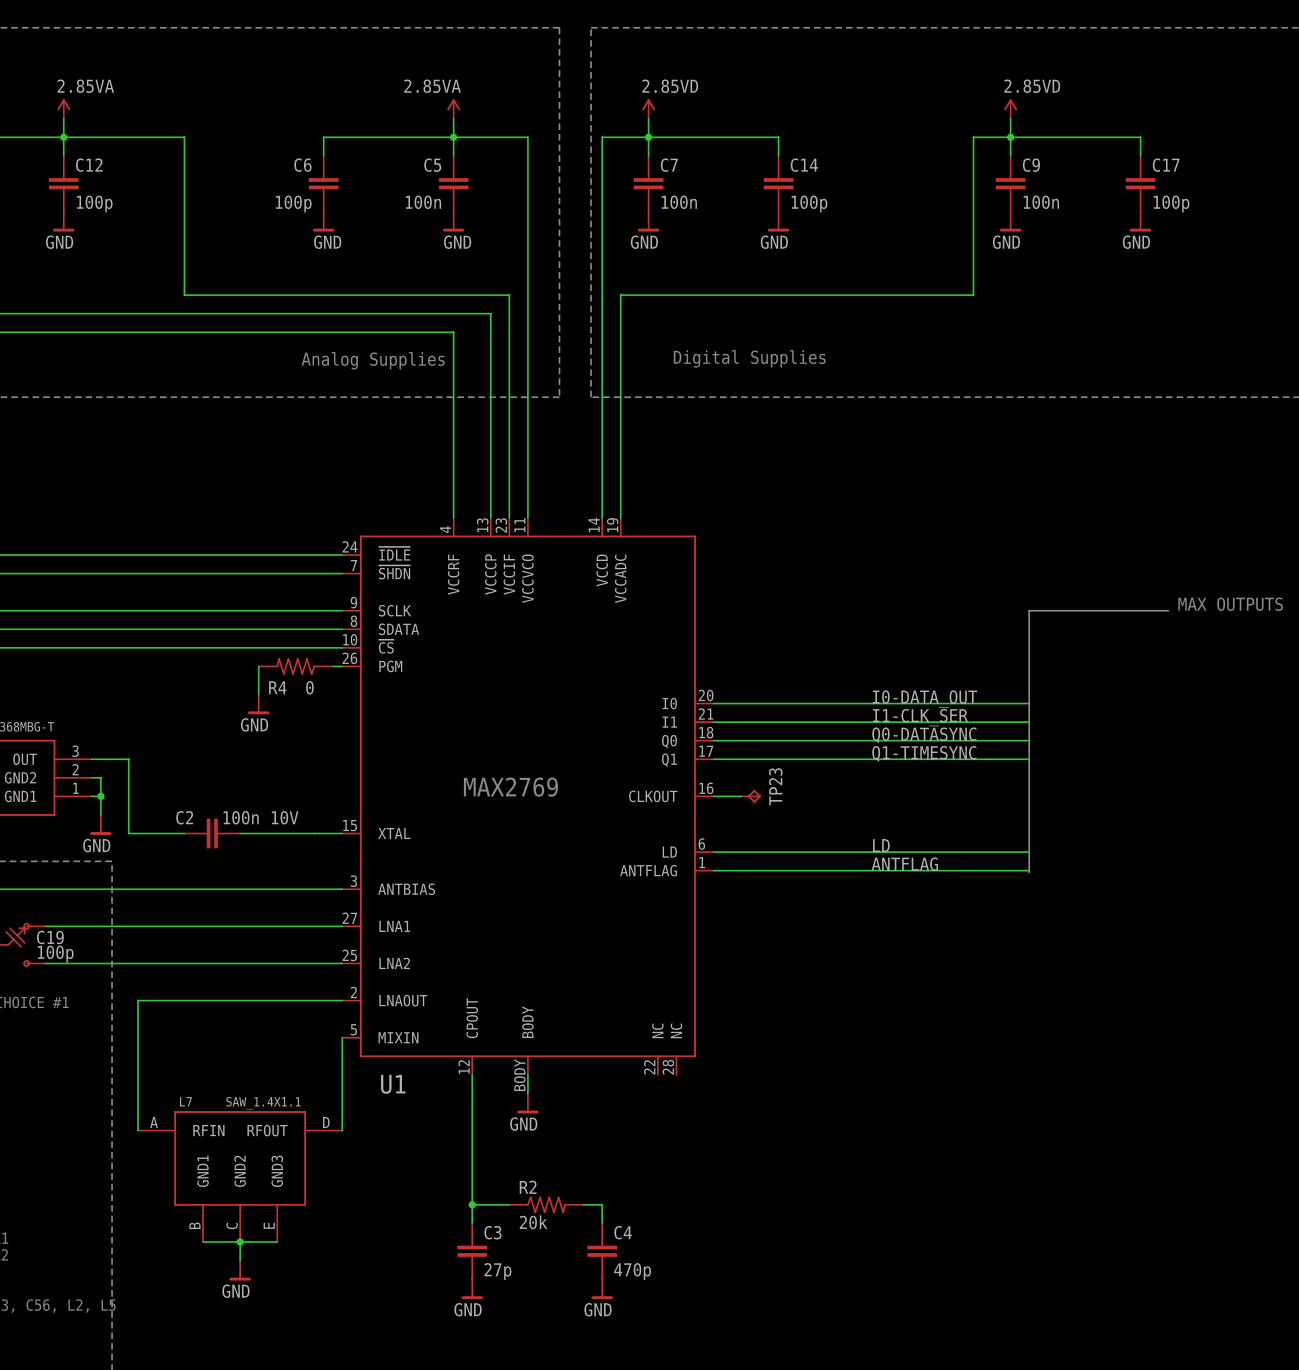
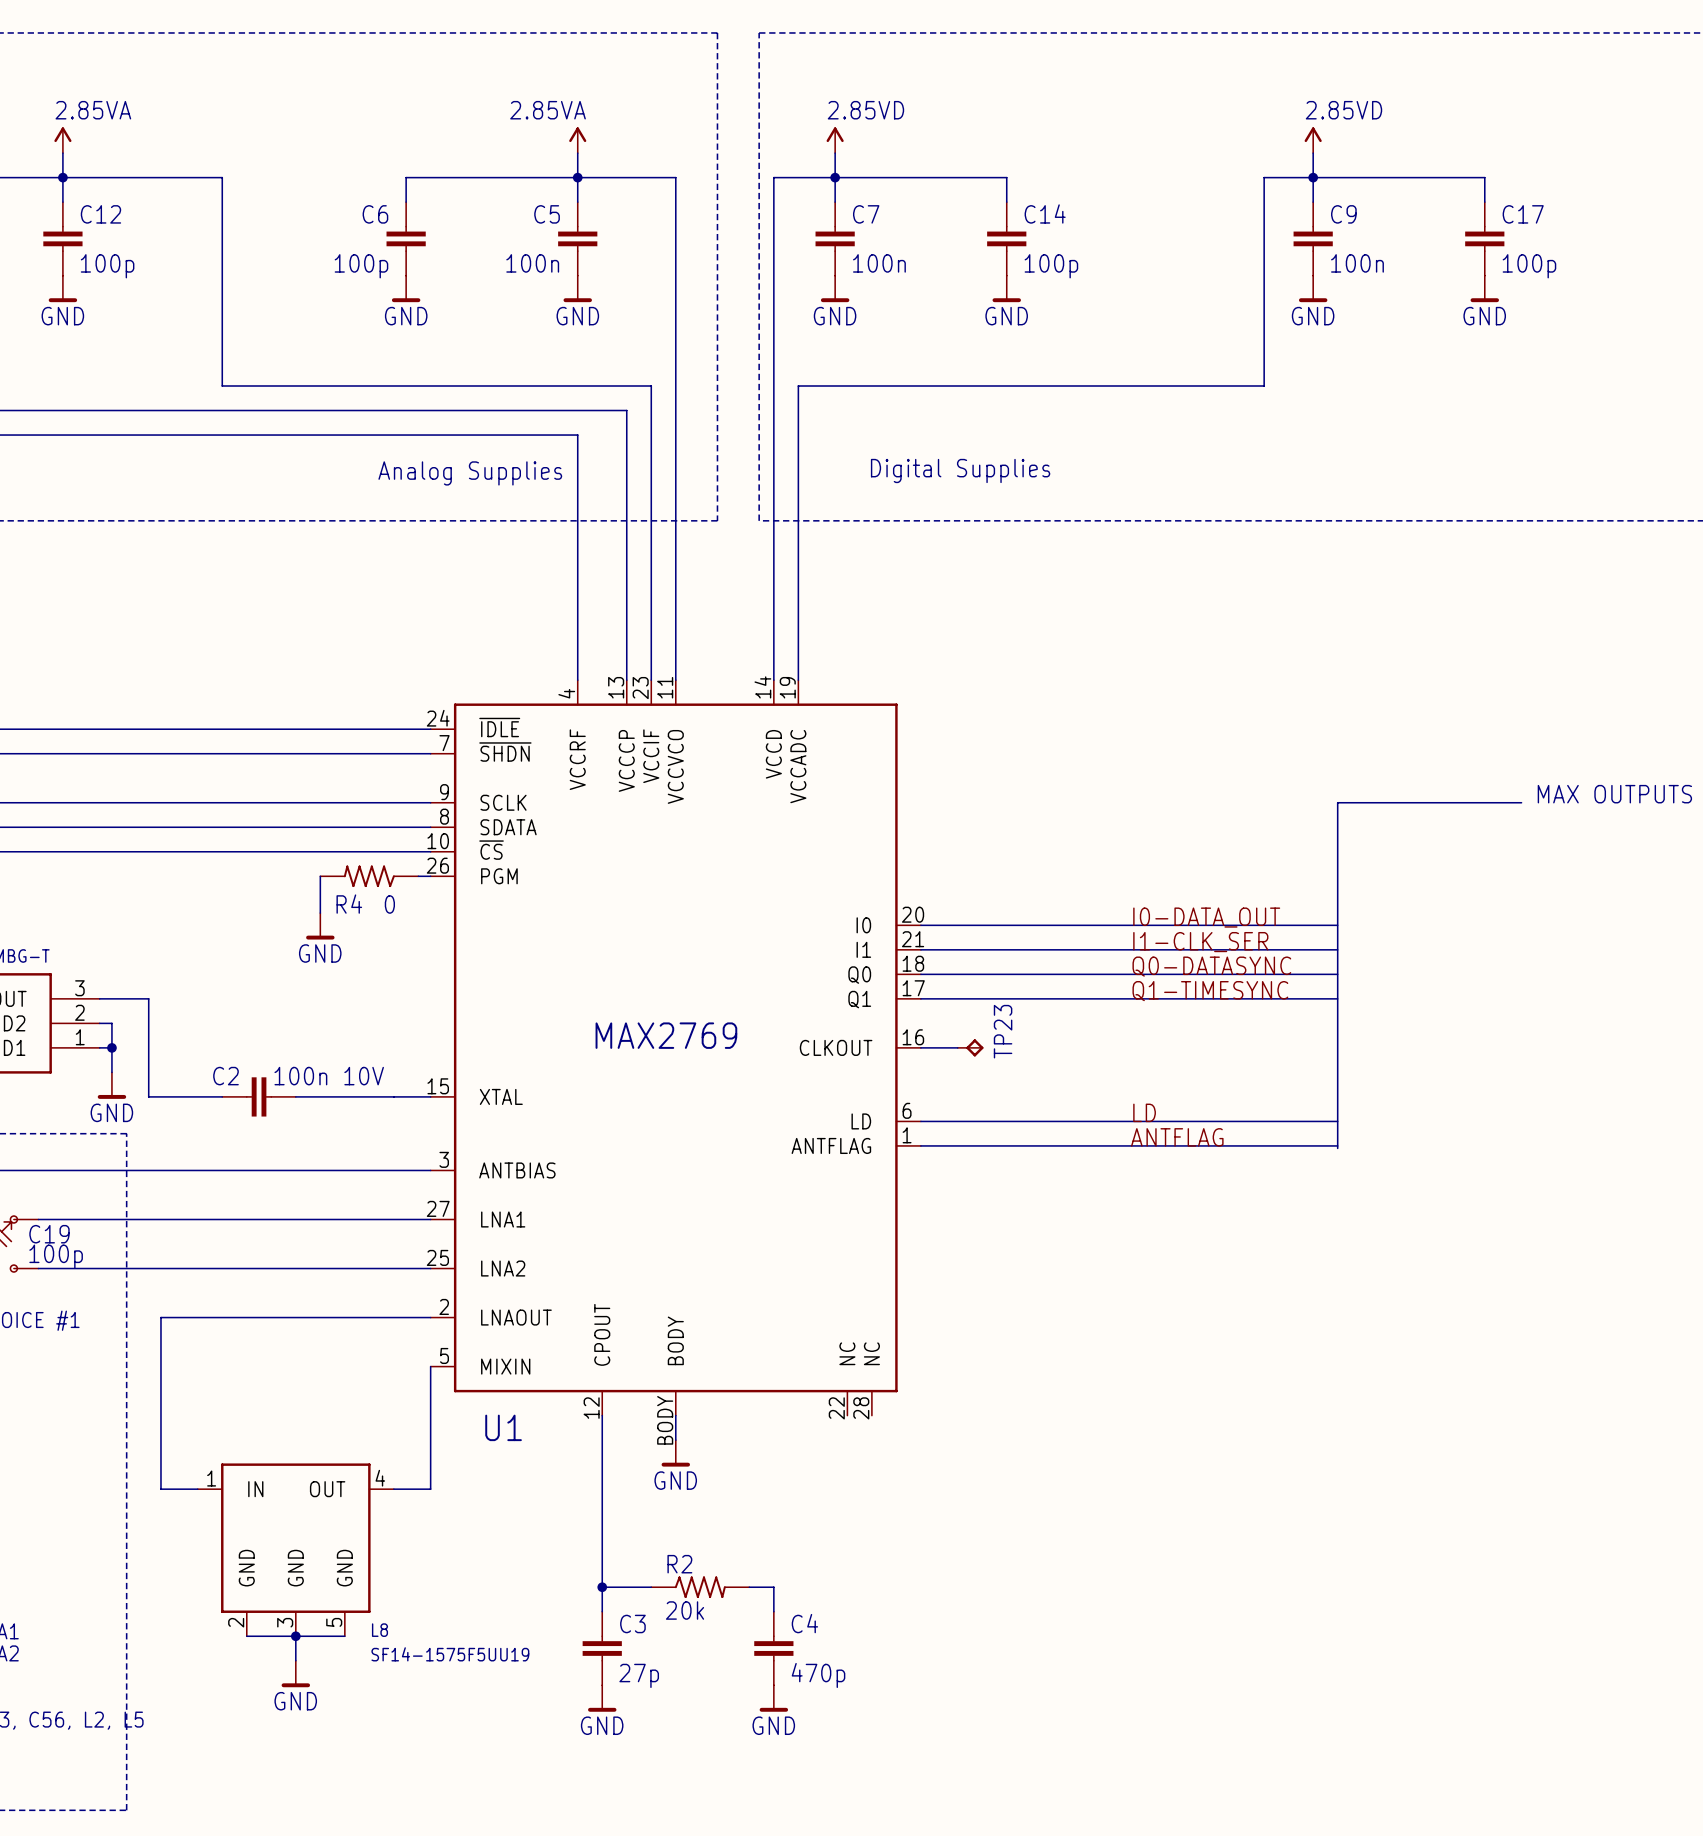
L7: SAW_1.4X1.1 (240, 1176) -> none
L8: none -> SF14-1575F5UU19 (295, 1549)

